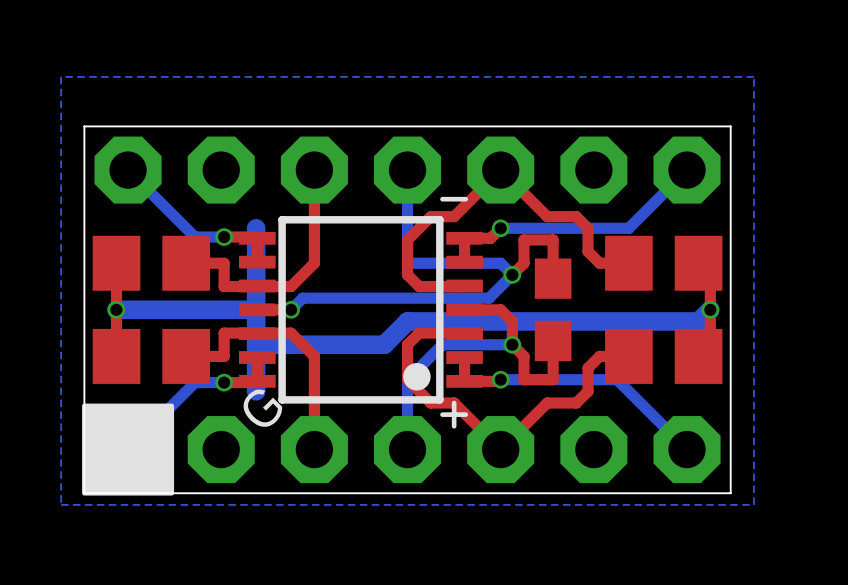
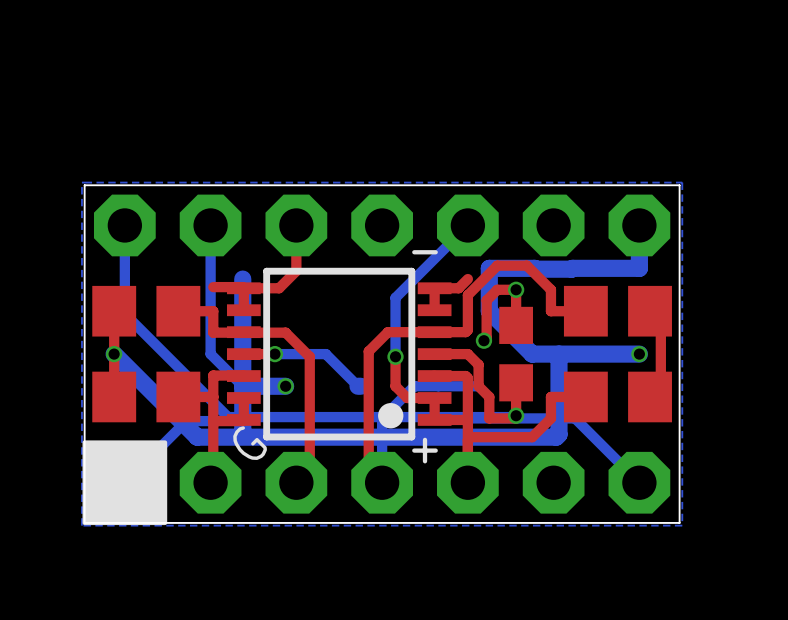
bottom zone outline: (61, 76) (61, 504) (753, 504) (753, 76) (61, 76) -> (81, 182) (81, 525) (682, 525) (682, 182) (81, 182)
bottom track: (128, 170) (195, 237) (224, 237) -> (124, 225) (124, 313) (228, 417) (516, 415)
bottom track: none -> (210, 225) (210, 354) (242, 386)
bottom track: (407, 170) (407, 263) (500, 263) (512, 274) (489, 298) (302, 298) (291, 309) -> none
bottom track: none -> (467, 225) (395, 297) (395, 356)
bottom track: (687, 170) (628, 228) (500, 228) -> (639, 225) (639, 268) (489, 268) (489, 311) (532, 354) (639, 354)
top track: (314, 219) (314, 263) (291, 286) -> (296, 271) (279, 288) (243, 288)
via: (500, 228) -> none
via: (224, 237) -> none
top track: (532, 239) (524, 239) (524, 263) (512, 274) -> (497, 289) (486, 300) (486, 338) (483, 340)
via: none -> (516, 289)
top track: (599, 263) (588, 251) (588, 228) (576, 216) (547, 216) (500, 170) (454, 216) (430, 216) (407, 239) (407, 274) (419, 286) (464, 286) -> (559, 311) (550, 311) (550, 289) (526, 265) (497, 265) (467, 295) (467, 329) (465, 332) (387, 332) (368, 351) (368, 469) (382, 482)
via position: (512, 274) -> (483, 340)
bottom track: (116, 309) (256, 309) -> (114, 354) (197, 437) (556, 437) (559, 434) (559, 354)
bottom track: (710, 309) (698, 321) (407, 321) (384, 344) -> none
via position: (710, 309) -> (639, 354)
top track: none -> (395, 356) (395, 386) (407, 397) (434, 397)
via: none -> (395, 356)
top track: (256, 333) (291, 333) (314, 356) (314, 449) -> (274, 332) (285, 332) (309, 356) (309, 469) (296, 482)
top track: (464, 333) (419, 333) (407, 344) (407, 379) (430, 402) (454, 402) (500, 449) (547, 402) (576, 402) (588, 391) (588, 368) (599, 356) -> (467, 439) (470, 437) (532, 437) (550, 418) (550, 396) (559, 396)
top track: none -> (434, 376) (465, 376) (467, 378) (467, 482)
bottom track: (302, 344) (381, 344) -> (274, 354) (325, 354) (358, 386)
via: none -> (285, 386)
via: (512, 344) -> none
top track: none -> (213, 396) (213, 480) (210, 482)
via: none -> (516, 415)
via: (500, 379) -> none
via: (224, 382) -> none

